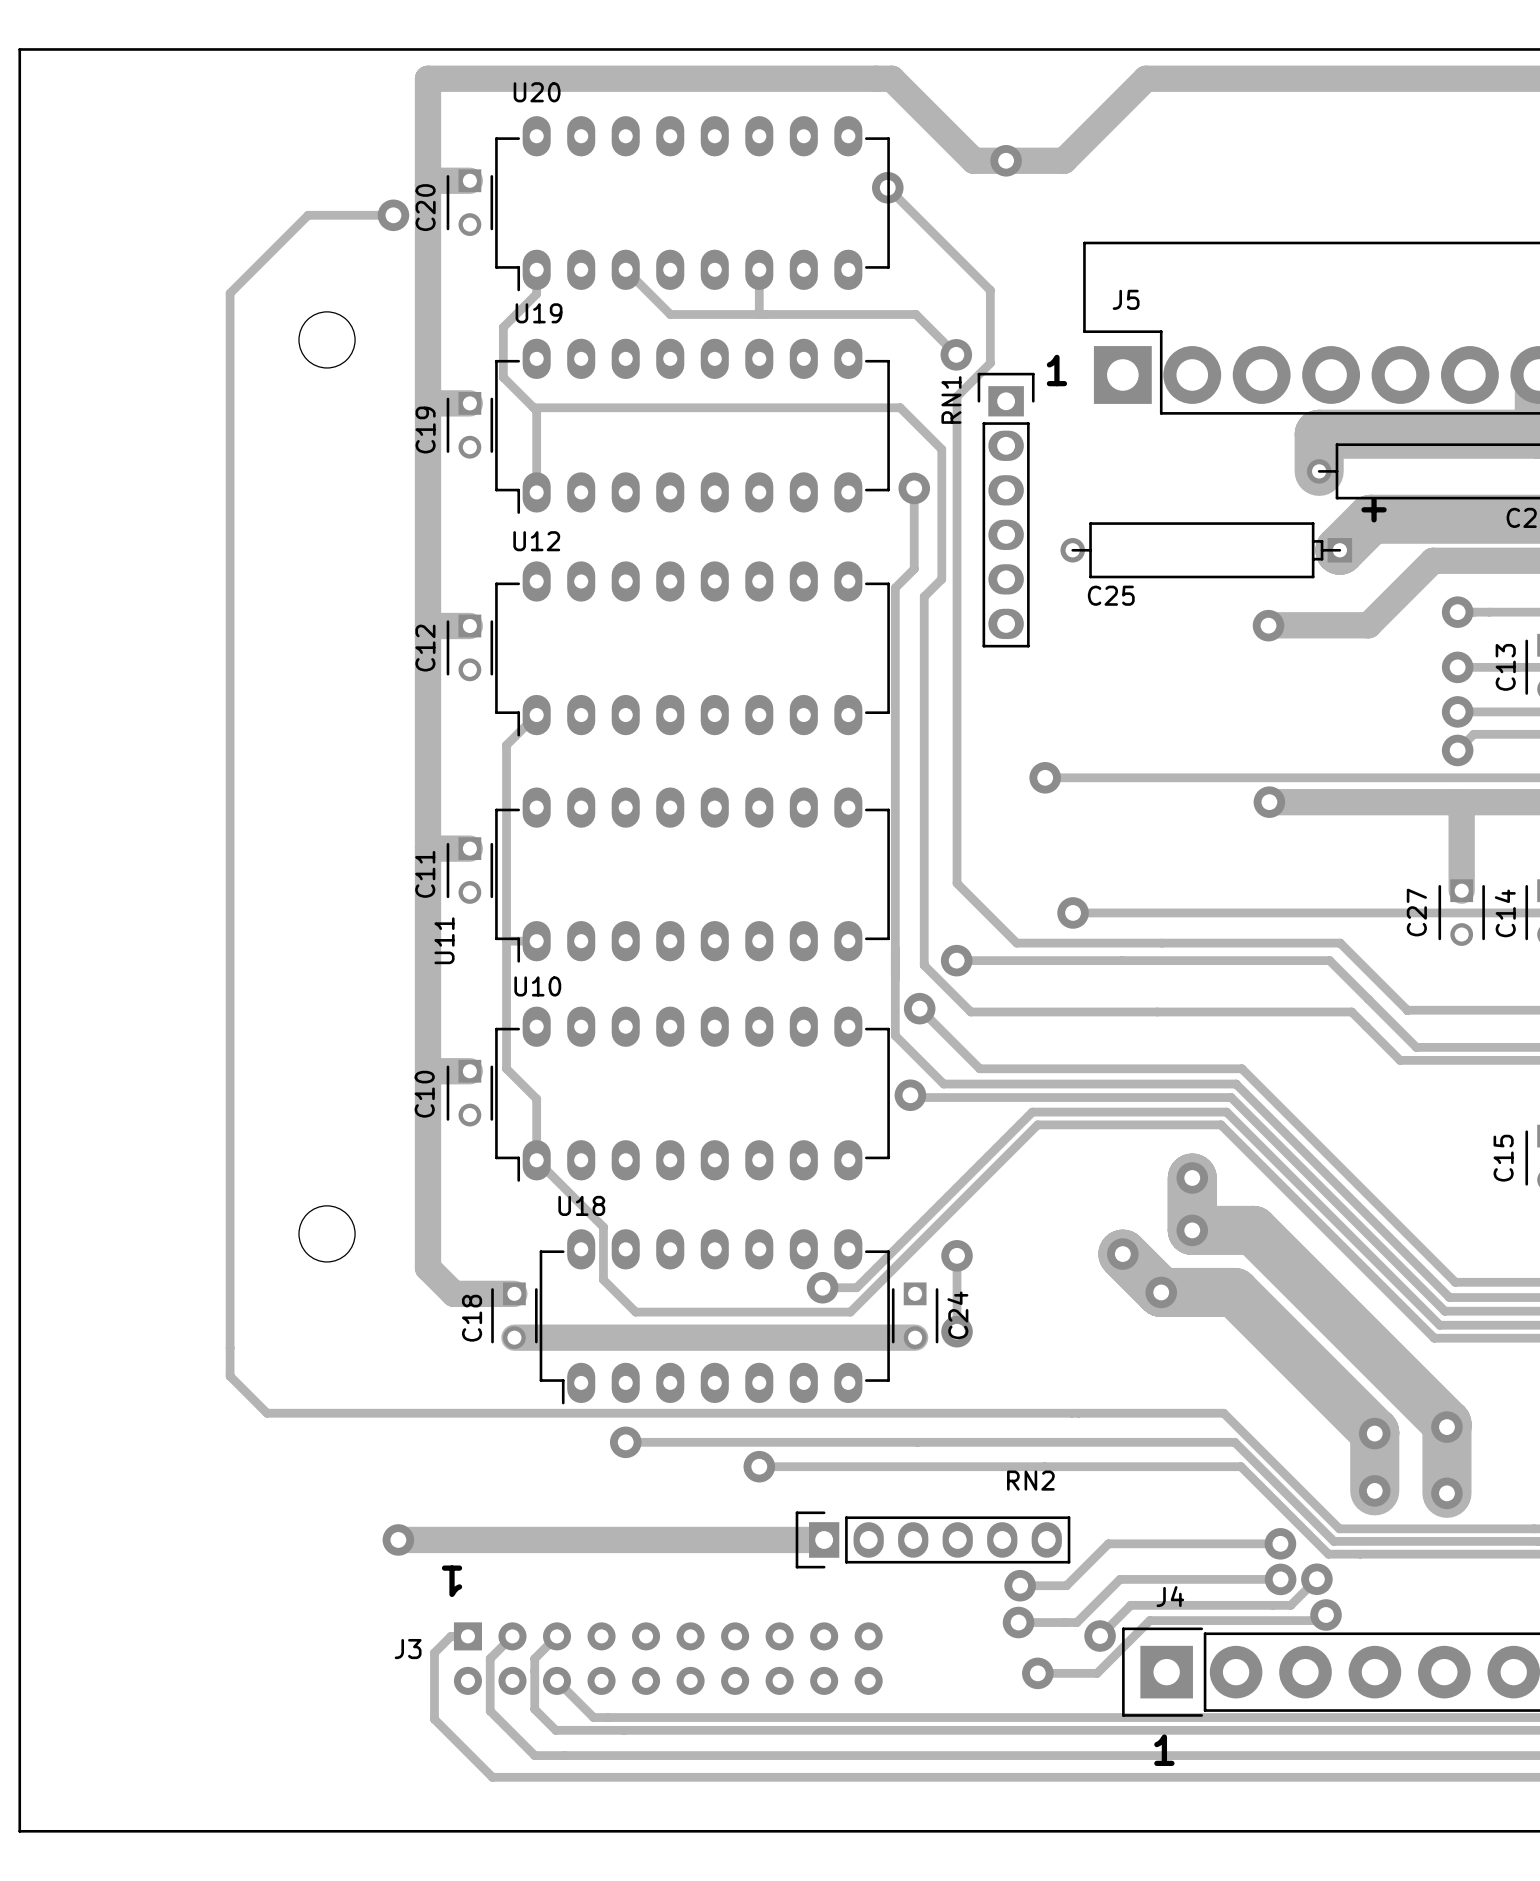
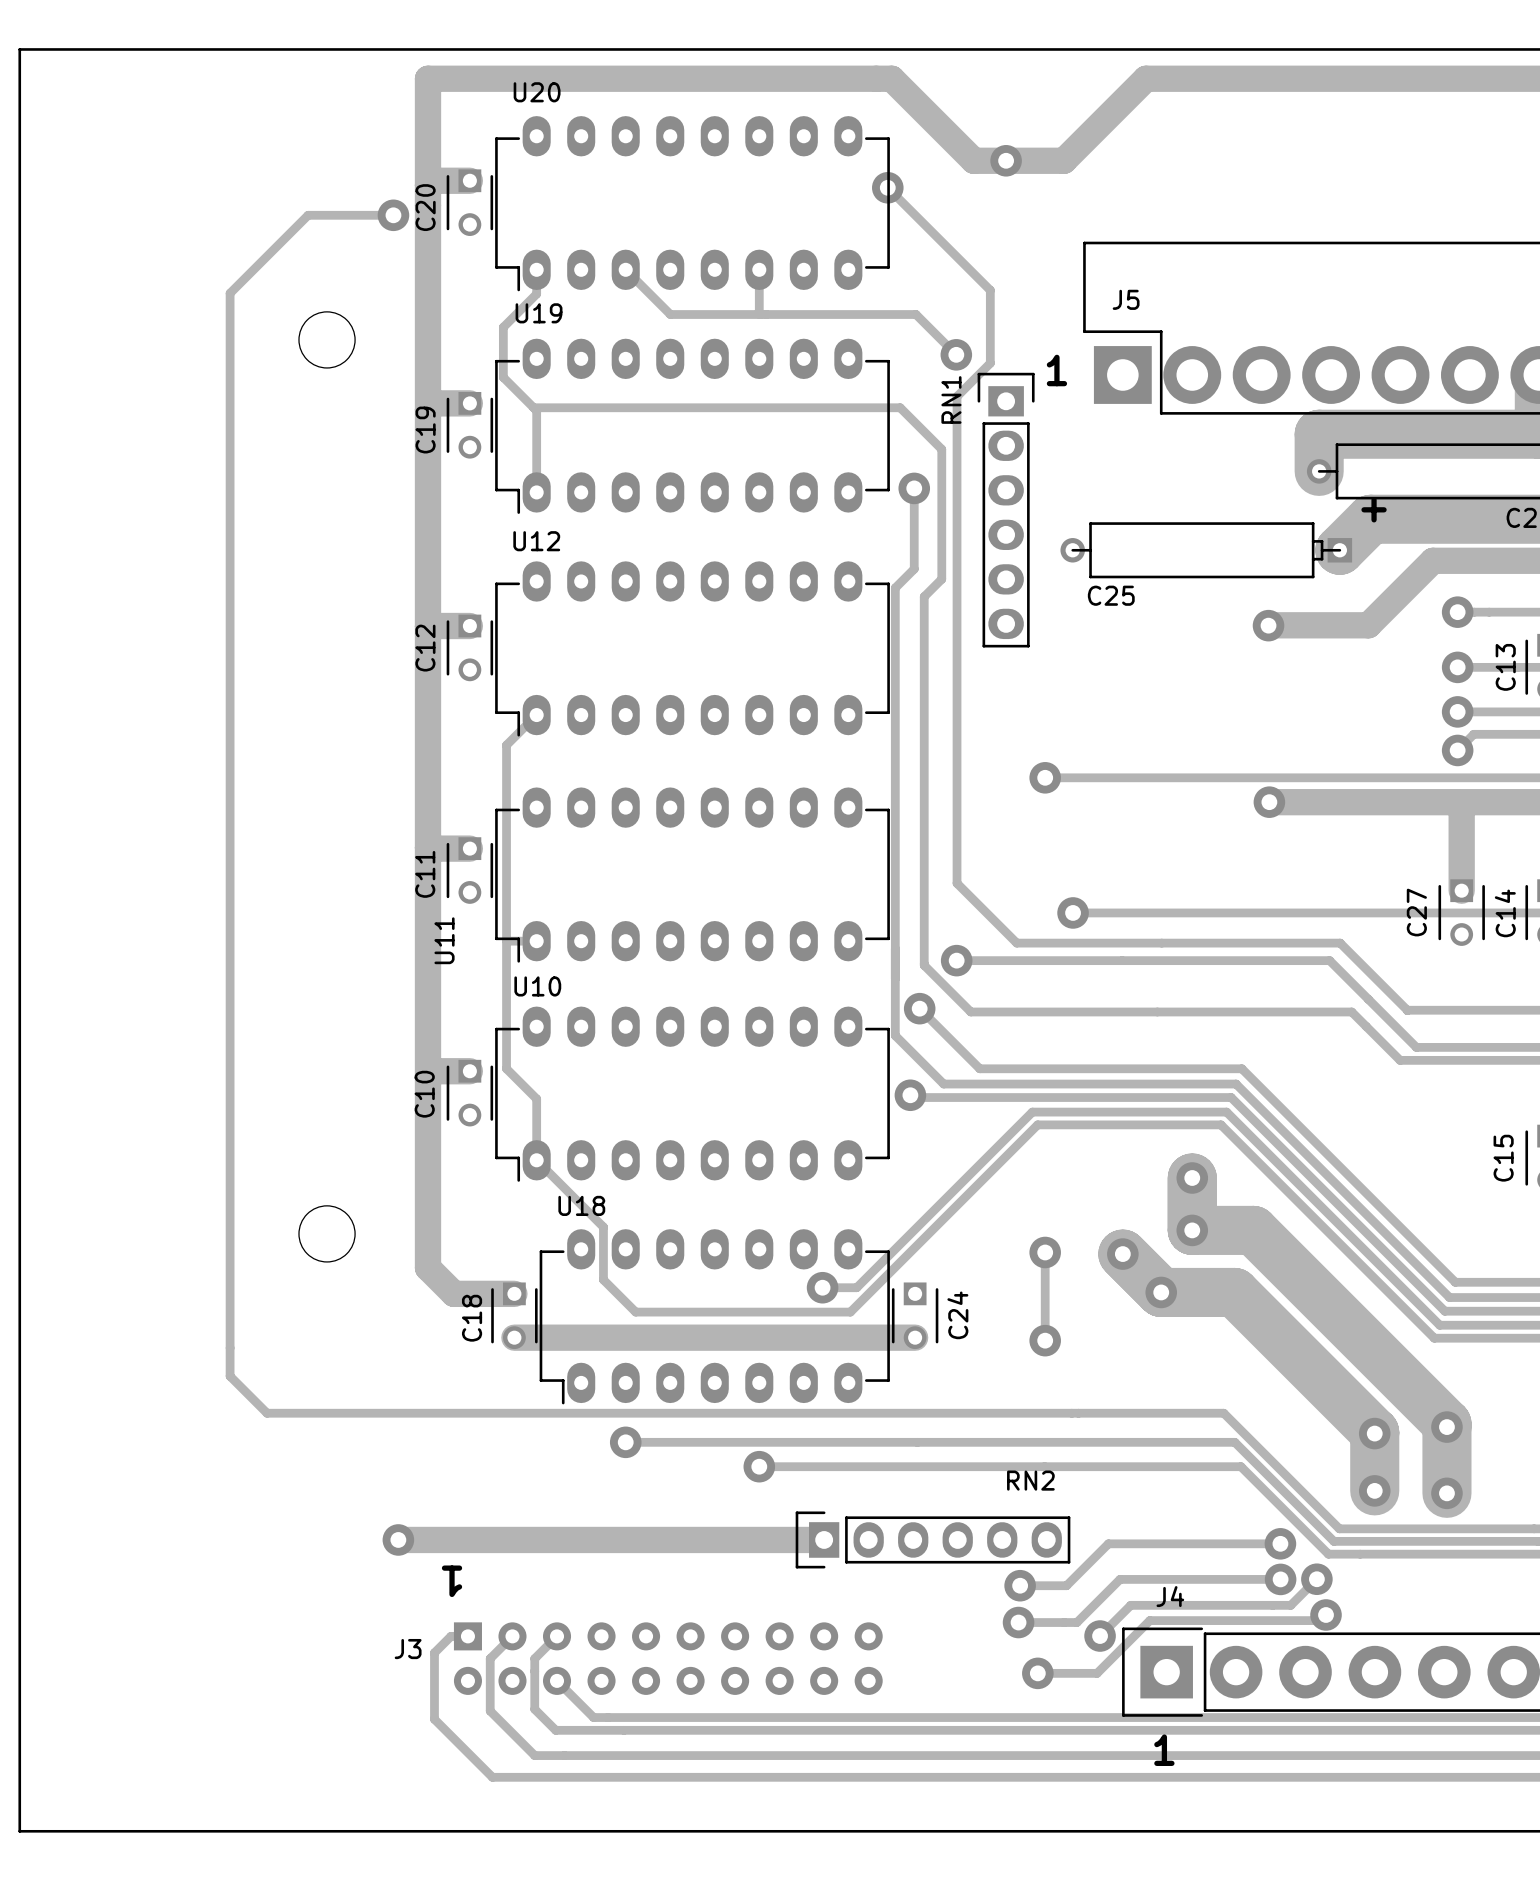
track: none -> (1045, 1252) (1045, 1340)
via: none -> (1045, 1252)
track: (957, 1255) (957, 1331) -> none
via: (957, 1255) -> none
via: (957, 1331) -> none
via: none -> (1045, 1340)

